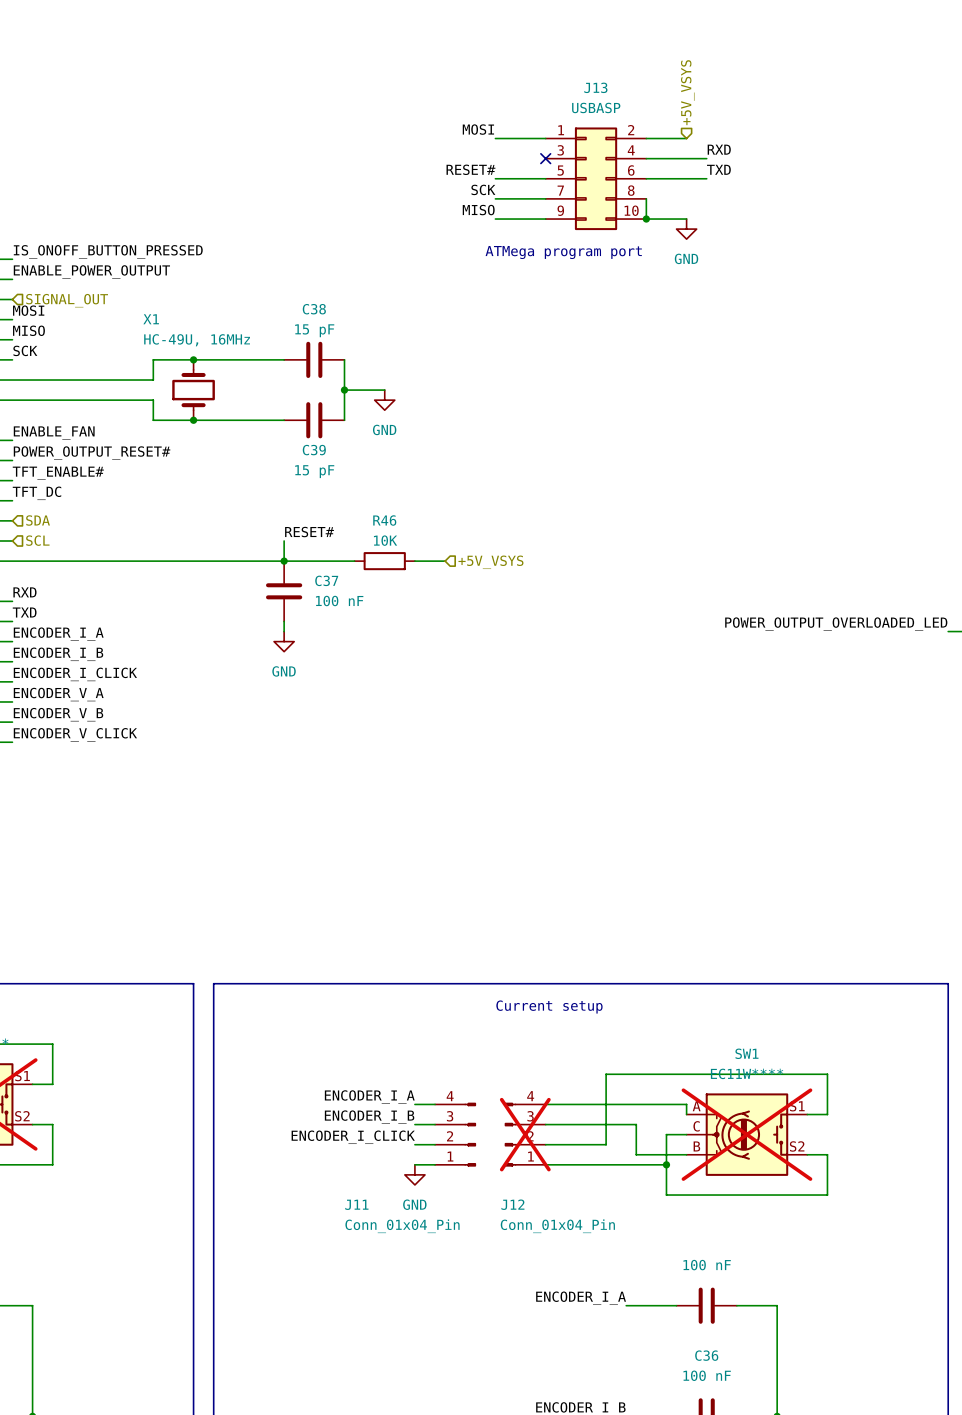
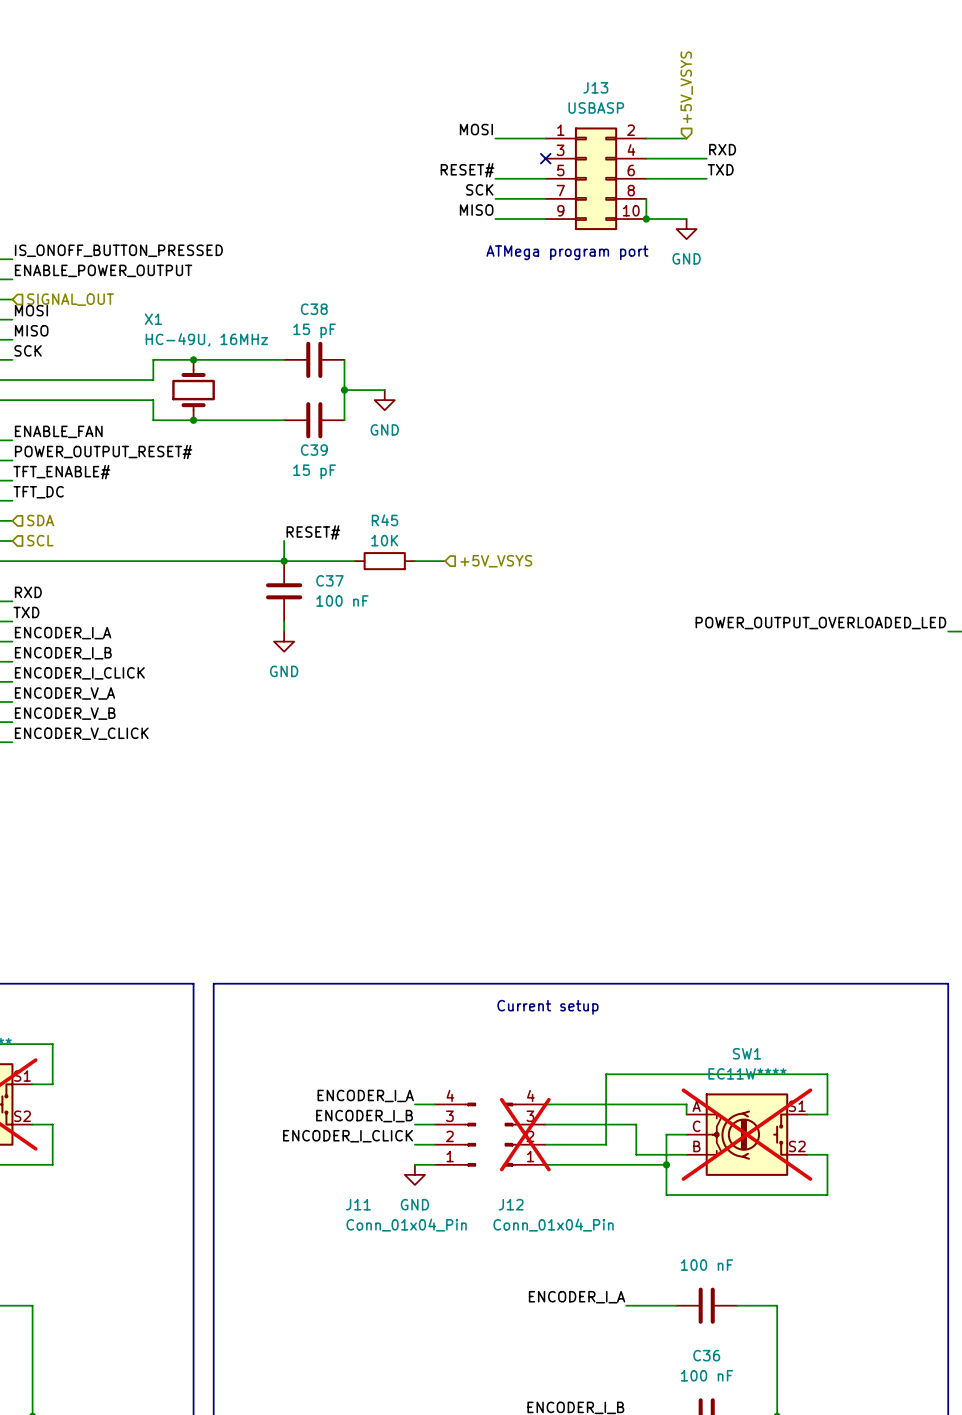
R46 name: R46 (384, 520) -> R45 (384, 520)

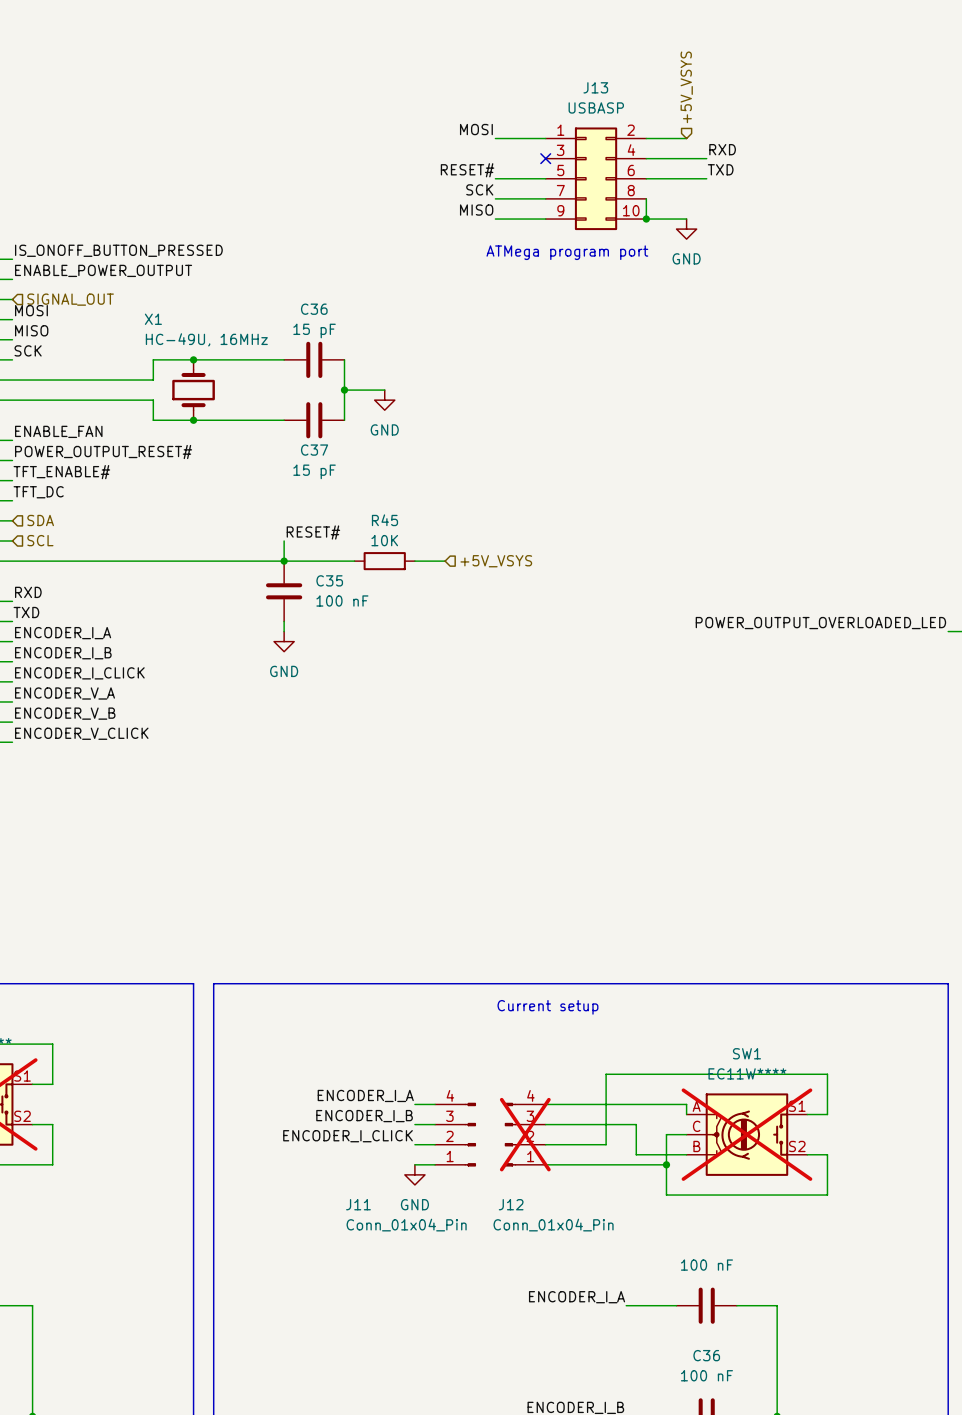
C38 name: C38 (314, 309) -> C36 (314, 309)
C39 name: C39 (314, 450) -> C37 (314, 450)
C37 name: C37 (329, 580) -> C35 (329, 580)

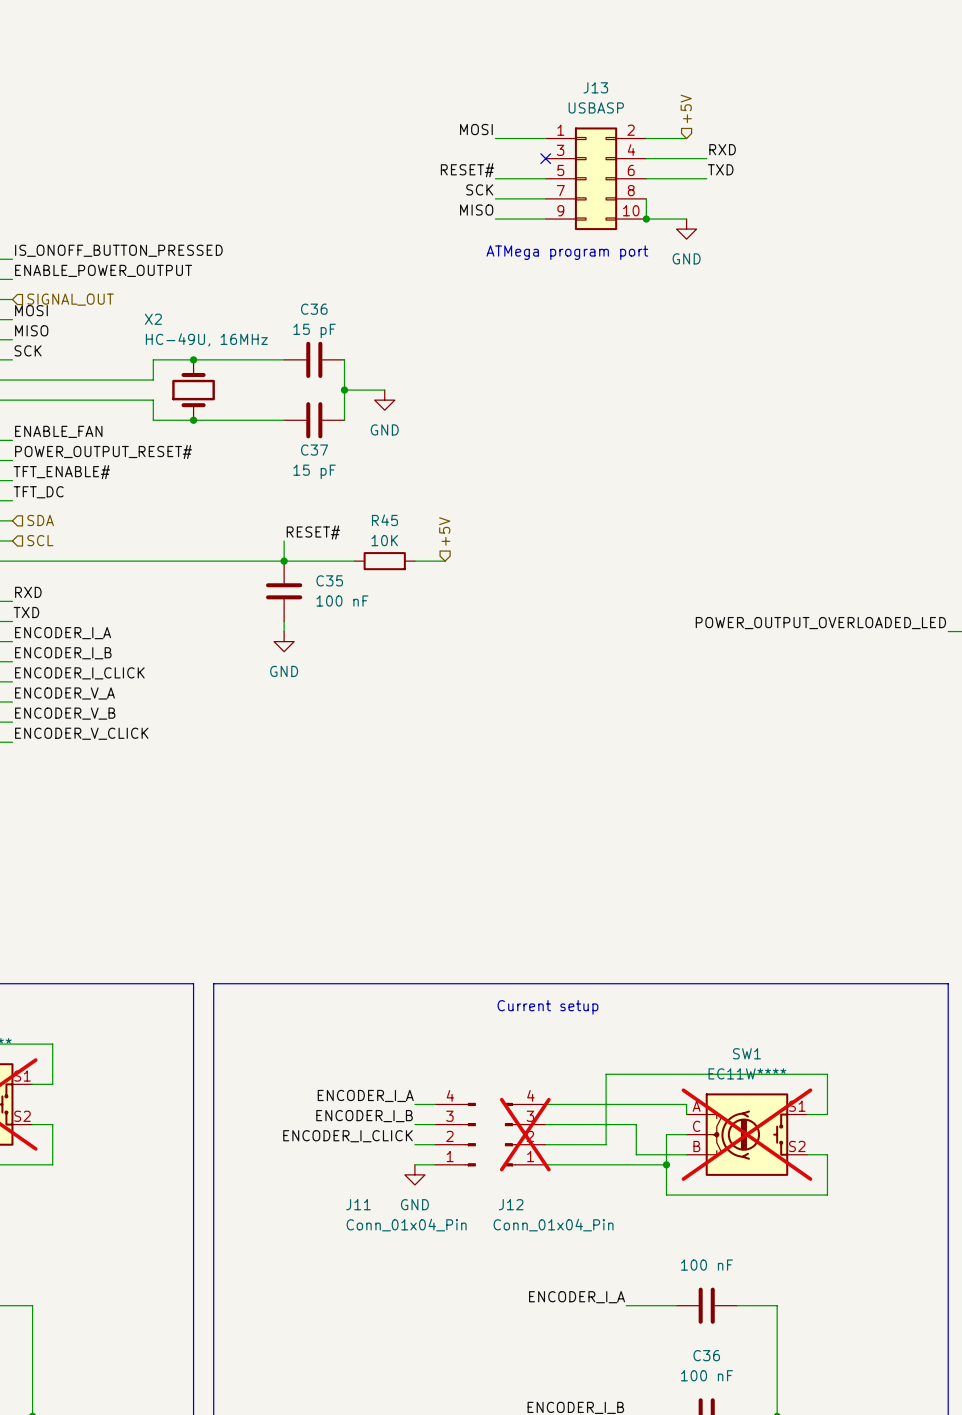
hierarchical label: +5V_VSYS (686, 87) -> +5V (686, 108)
X1 name: X1 (153, 319) -> X2 (153, 319)
hierarchical label: none -> +5V (444, 531)
hierarchical label: +5V_VSYS (496, 561) -> none

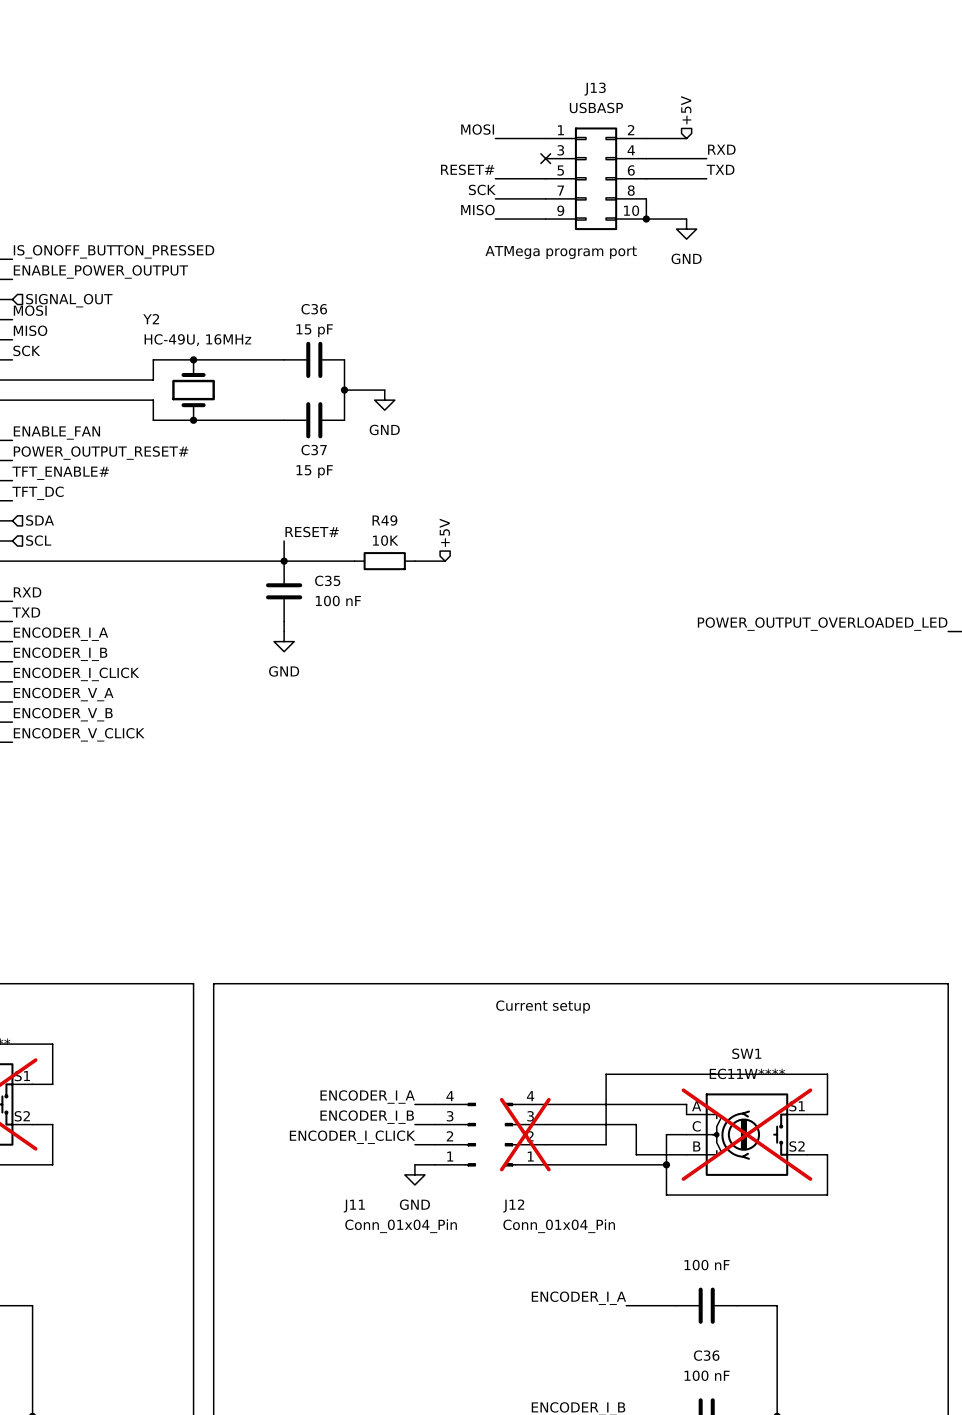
X2 name: X2 (153, 319) -> Y2 (151, 319)
R45 name: R45 (384, 520) -> R49 (384, 520)

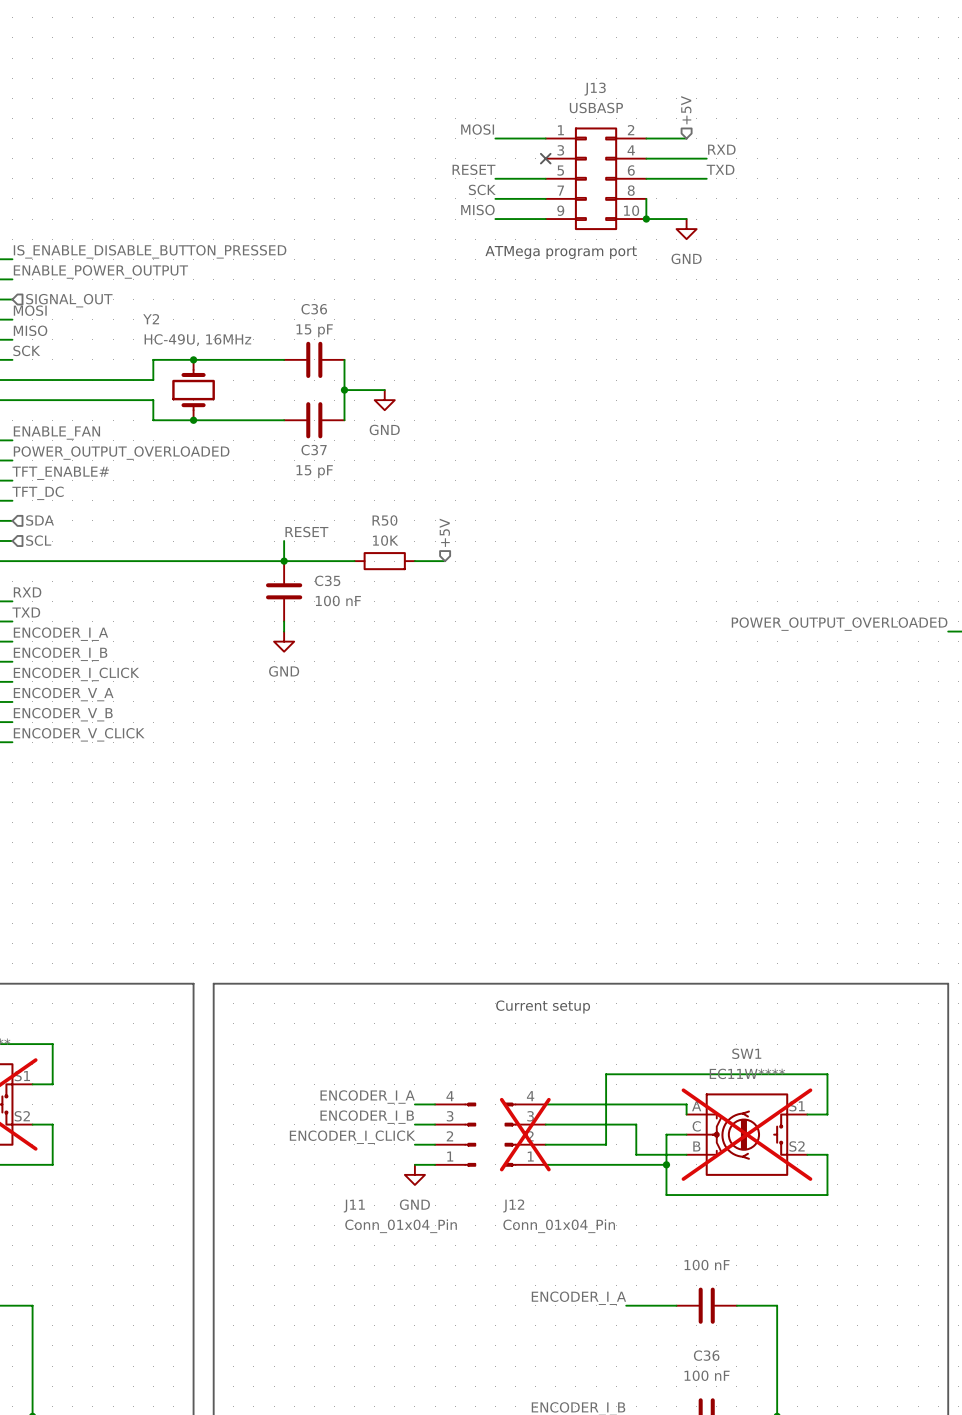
label: RESET# (467, 169) -> RESET (474, 169)
label: IS_ONOFF_BUTTON_PRESSED (114, 251) -> IS_ENABLE_DISABLE_BUTTON_PRESSED (150, 251)
label: POWER_OUTPUT_RESET# (101, 453) -> POWER_OUTPUT_OVERLOADED (121, 453)
R49 name: R49 (384, 520) -> R50 (384, 520)
label: RESET# (312, 532) -> RESET (306, 532)
label: POWER_OUTPUT_OVERLOADED_LED (822, 624) -> POWER_OUTPUT_OVERLOADED (839, 624)

